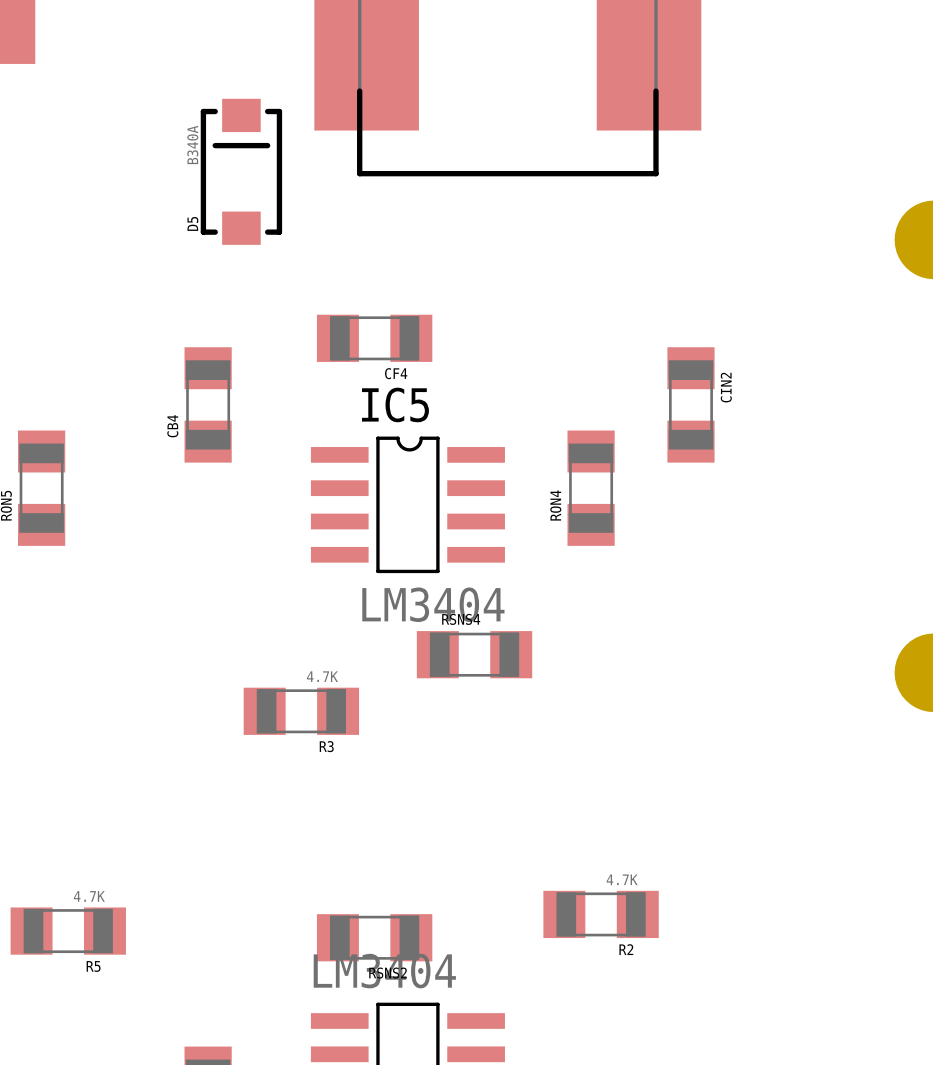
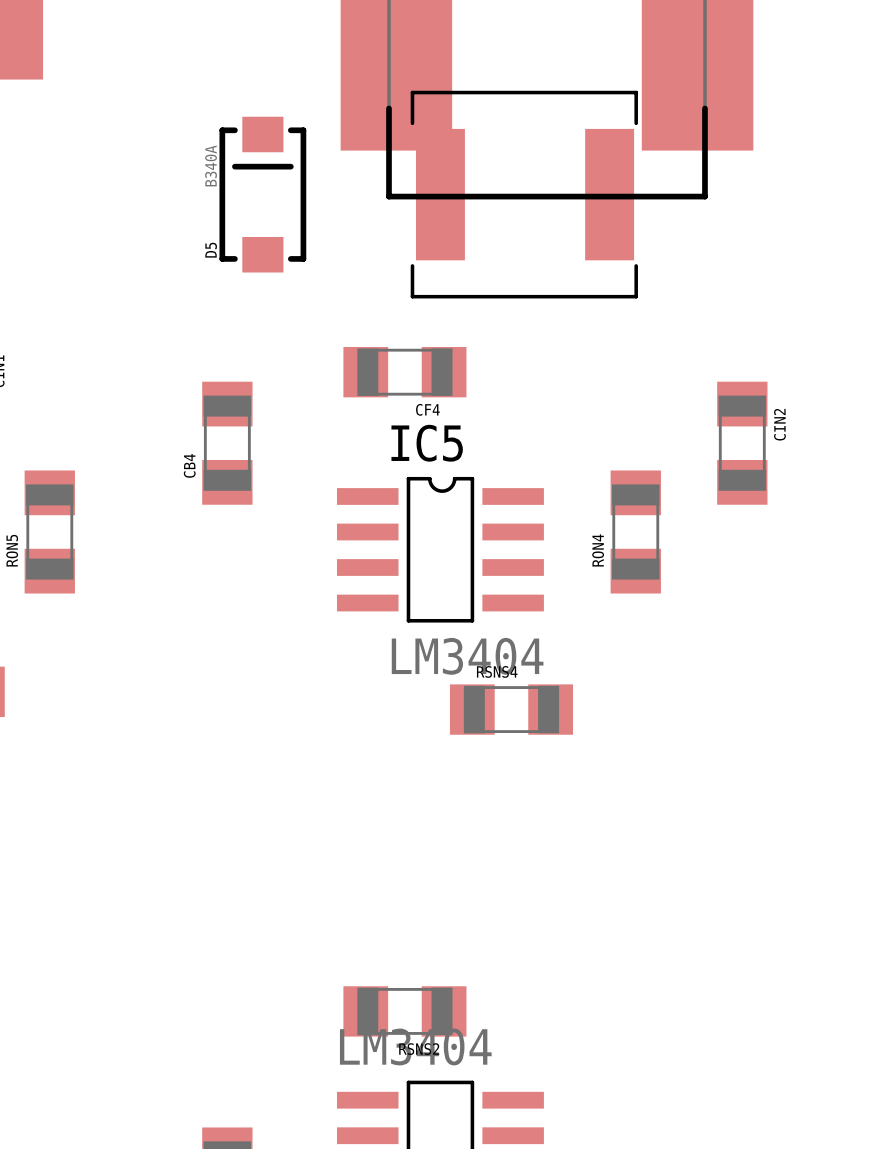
part: none -> (524, 194)
R3: 4.7K (301, 711) -> none
R2: 4.7K (601, 914) -> none
R5: 4.7K (68, 931) -> none

